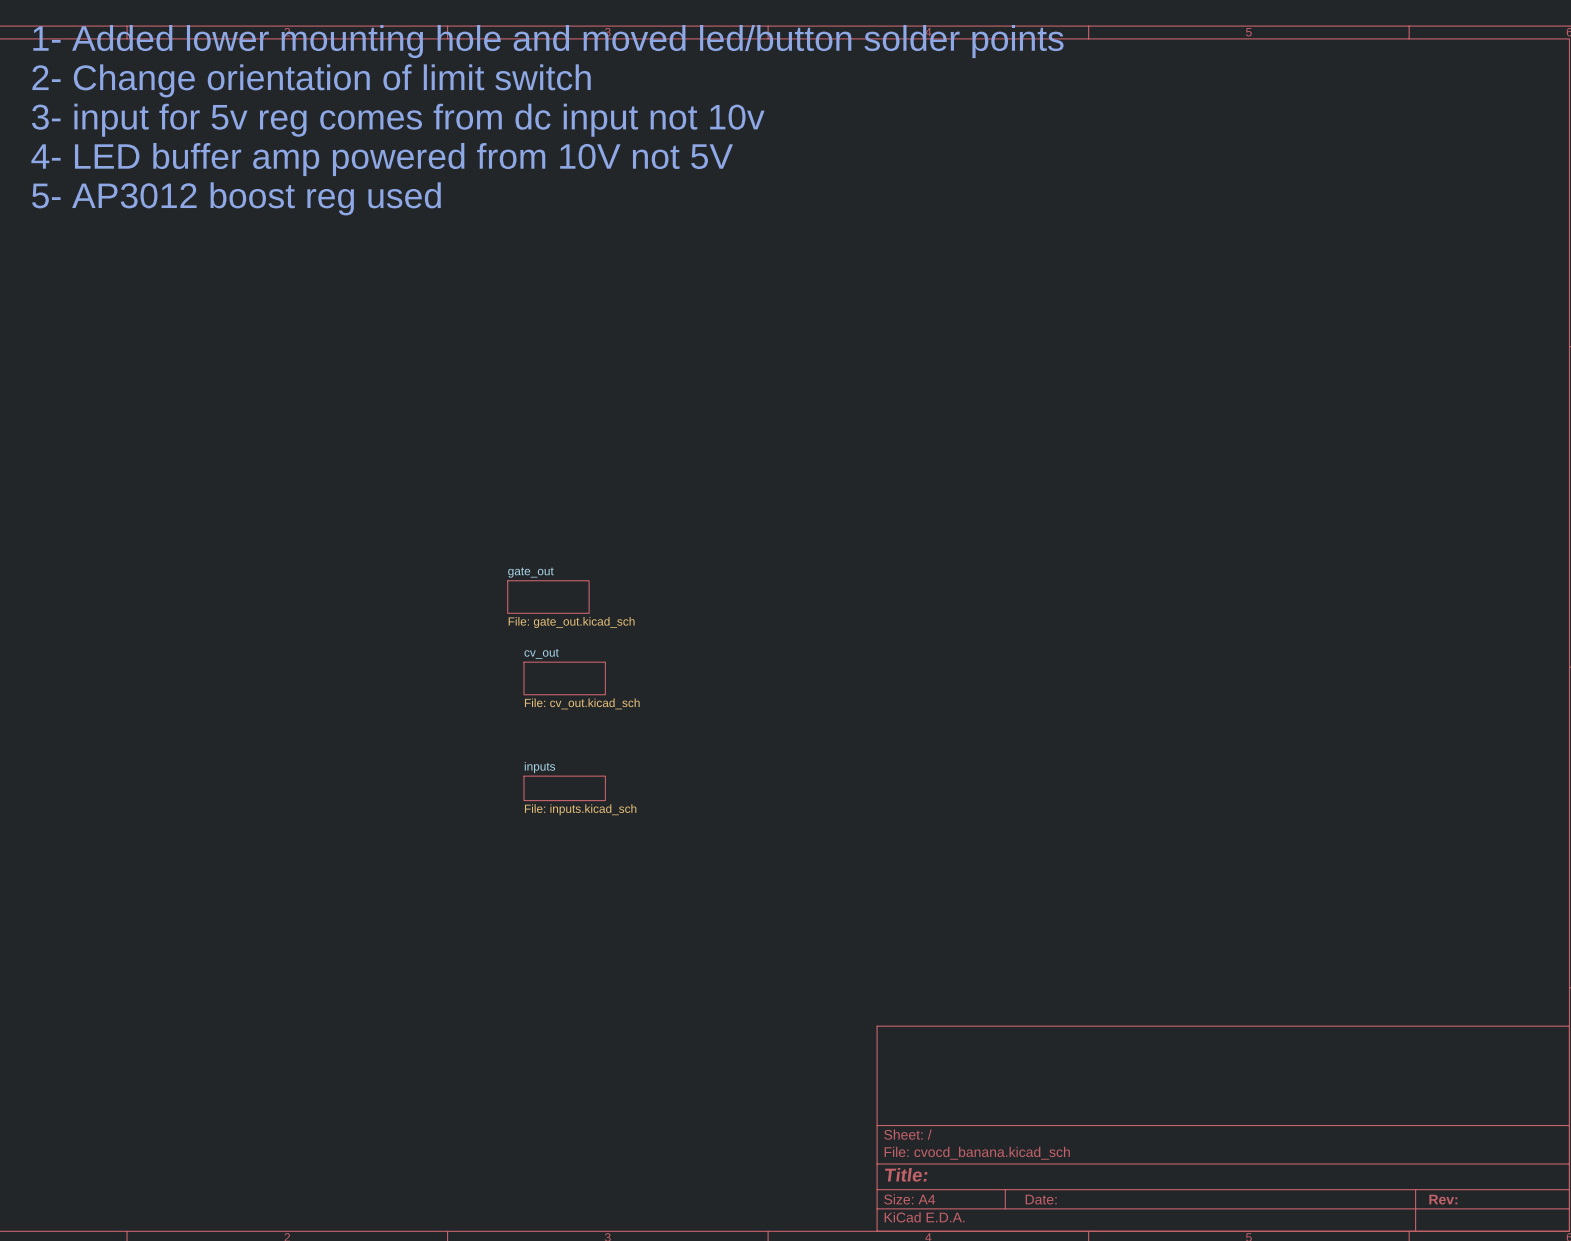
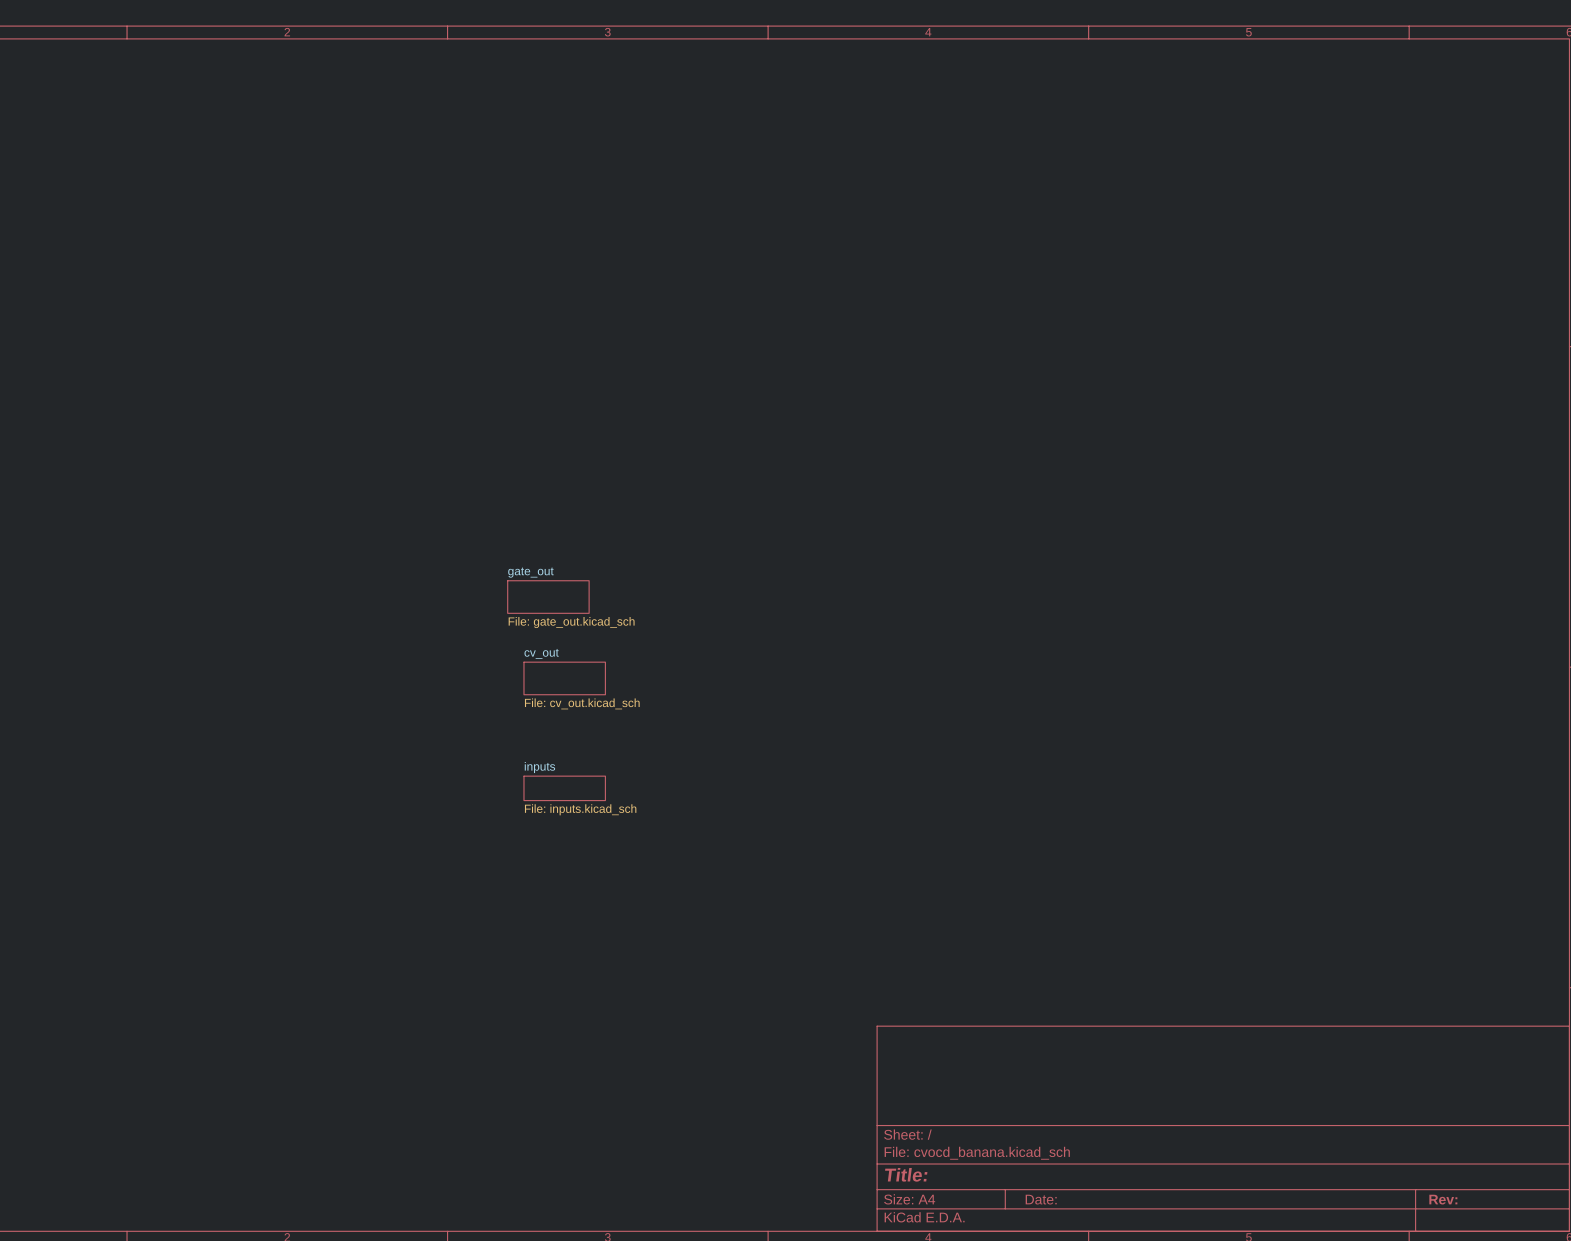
text: 1- Added lower mounting hole and moved led/button solder points (548, 41) -> none
text: 2- Change orientation of limit switch (311, 80) -> none
text: 3- input for 5v reg comes from dc input not 10v (398, 120) -> none
text: 4- LED buffer amp powered from 10V not 5V (382, 159) -> none
text: 5- AP3012 boost reg used (236, 198) -> none

